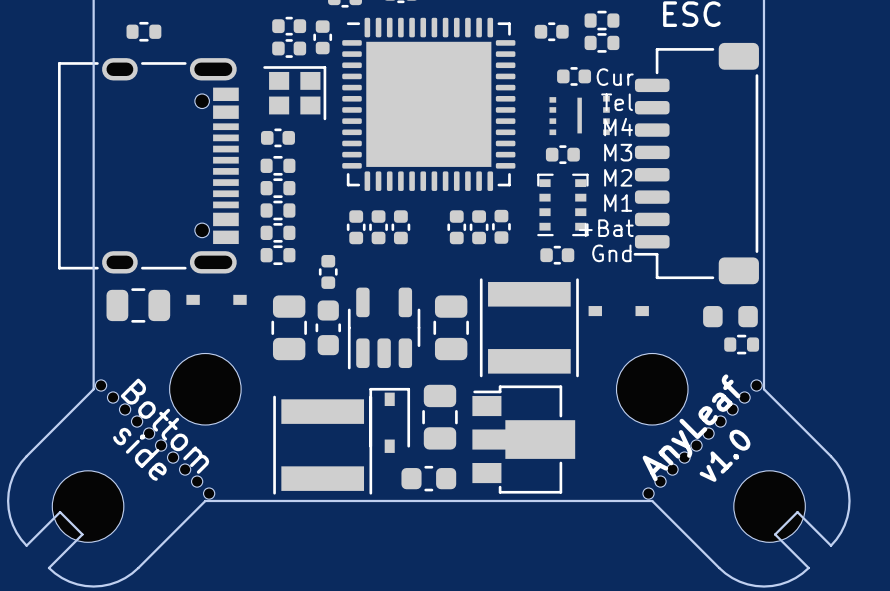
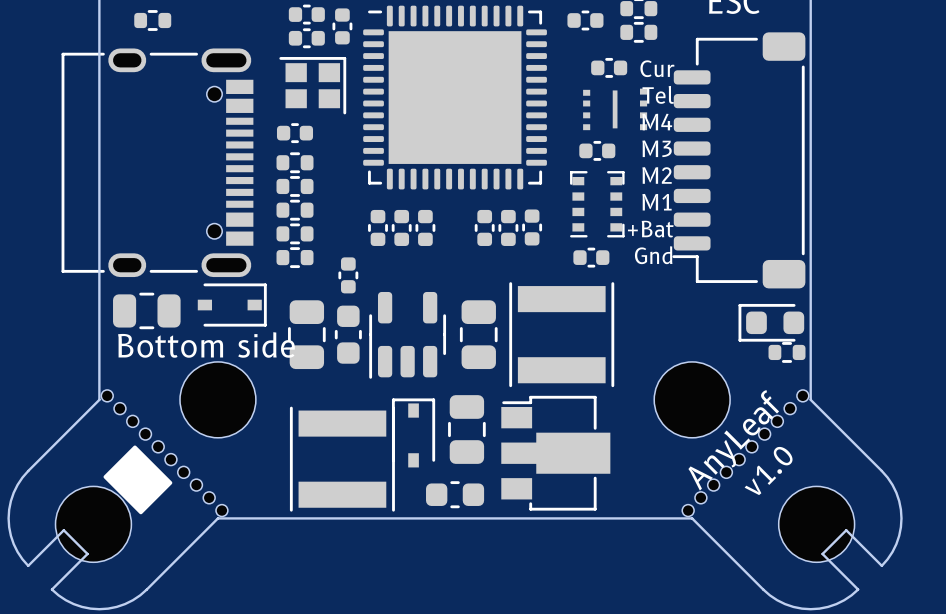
part footprint: [186, 294, 247, 305] -> [197, 283, 267, 327]
part footprint: [703, 306, 758, 328] -> [738, 303, 805, 342]
part: (618, 311) -> none
text: Bottom (165, 426) -> Bottom side (206, 344)
drawing: none -> [103, 445, 173, 515]
text: side (139, 454) -> none

